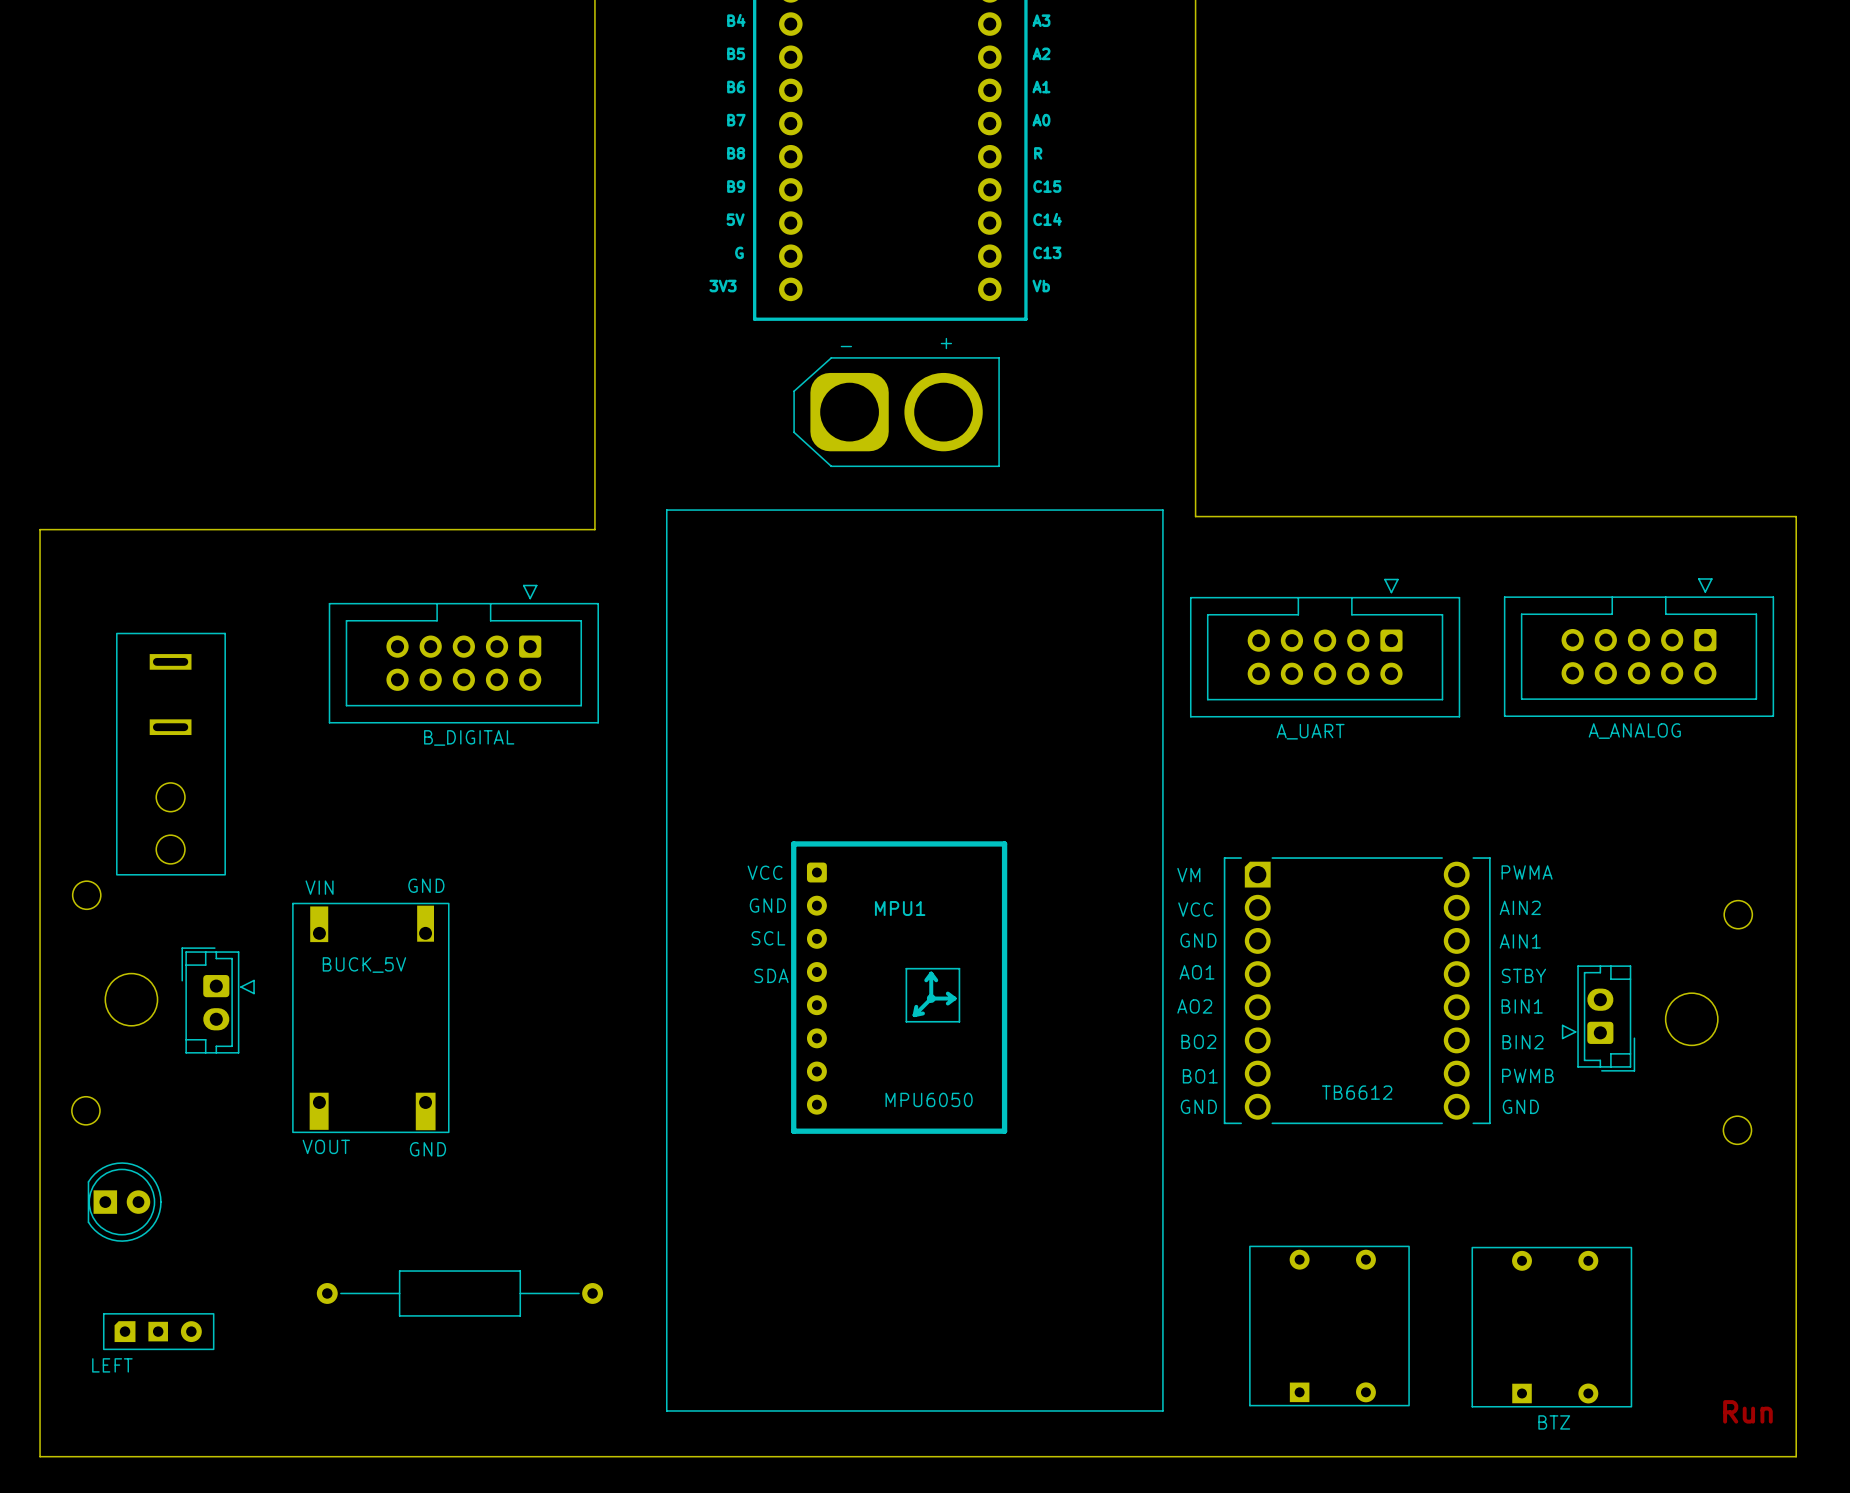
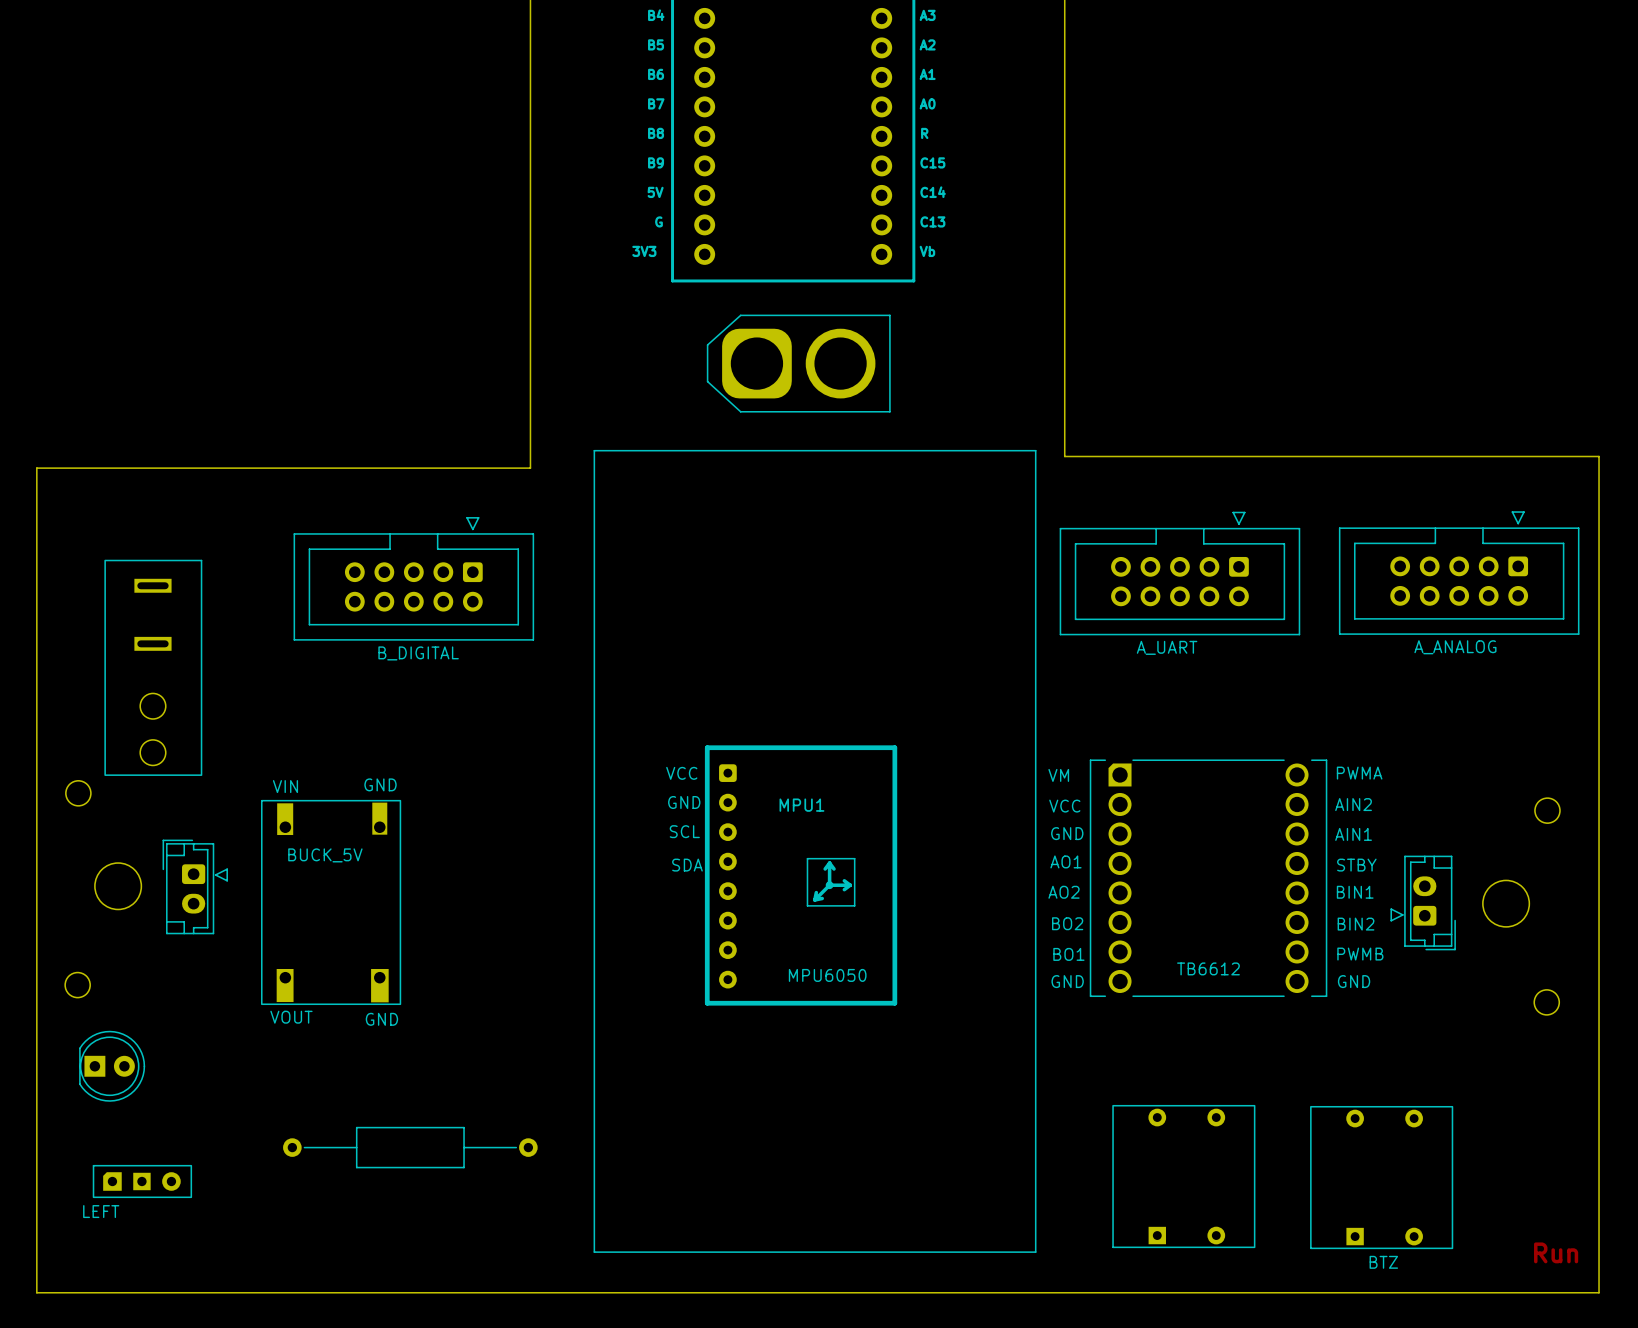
part text: + (946, 343) -> none
part text: - (846, 346) -> none

